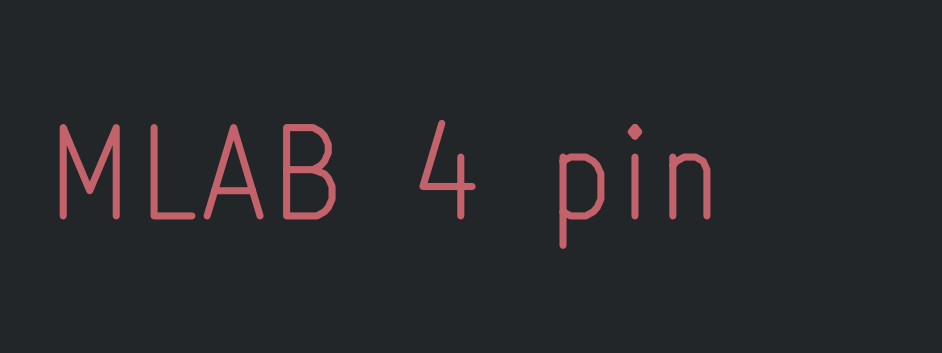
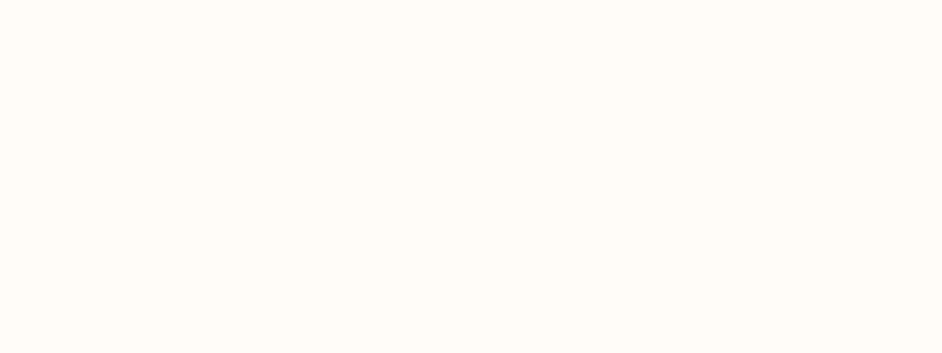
text: MLAB 4 pin (385, 184) -> none

